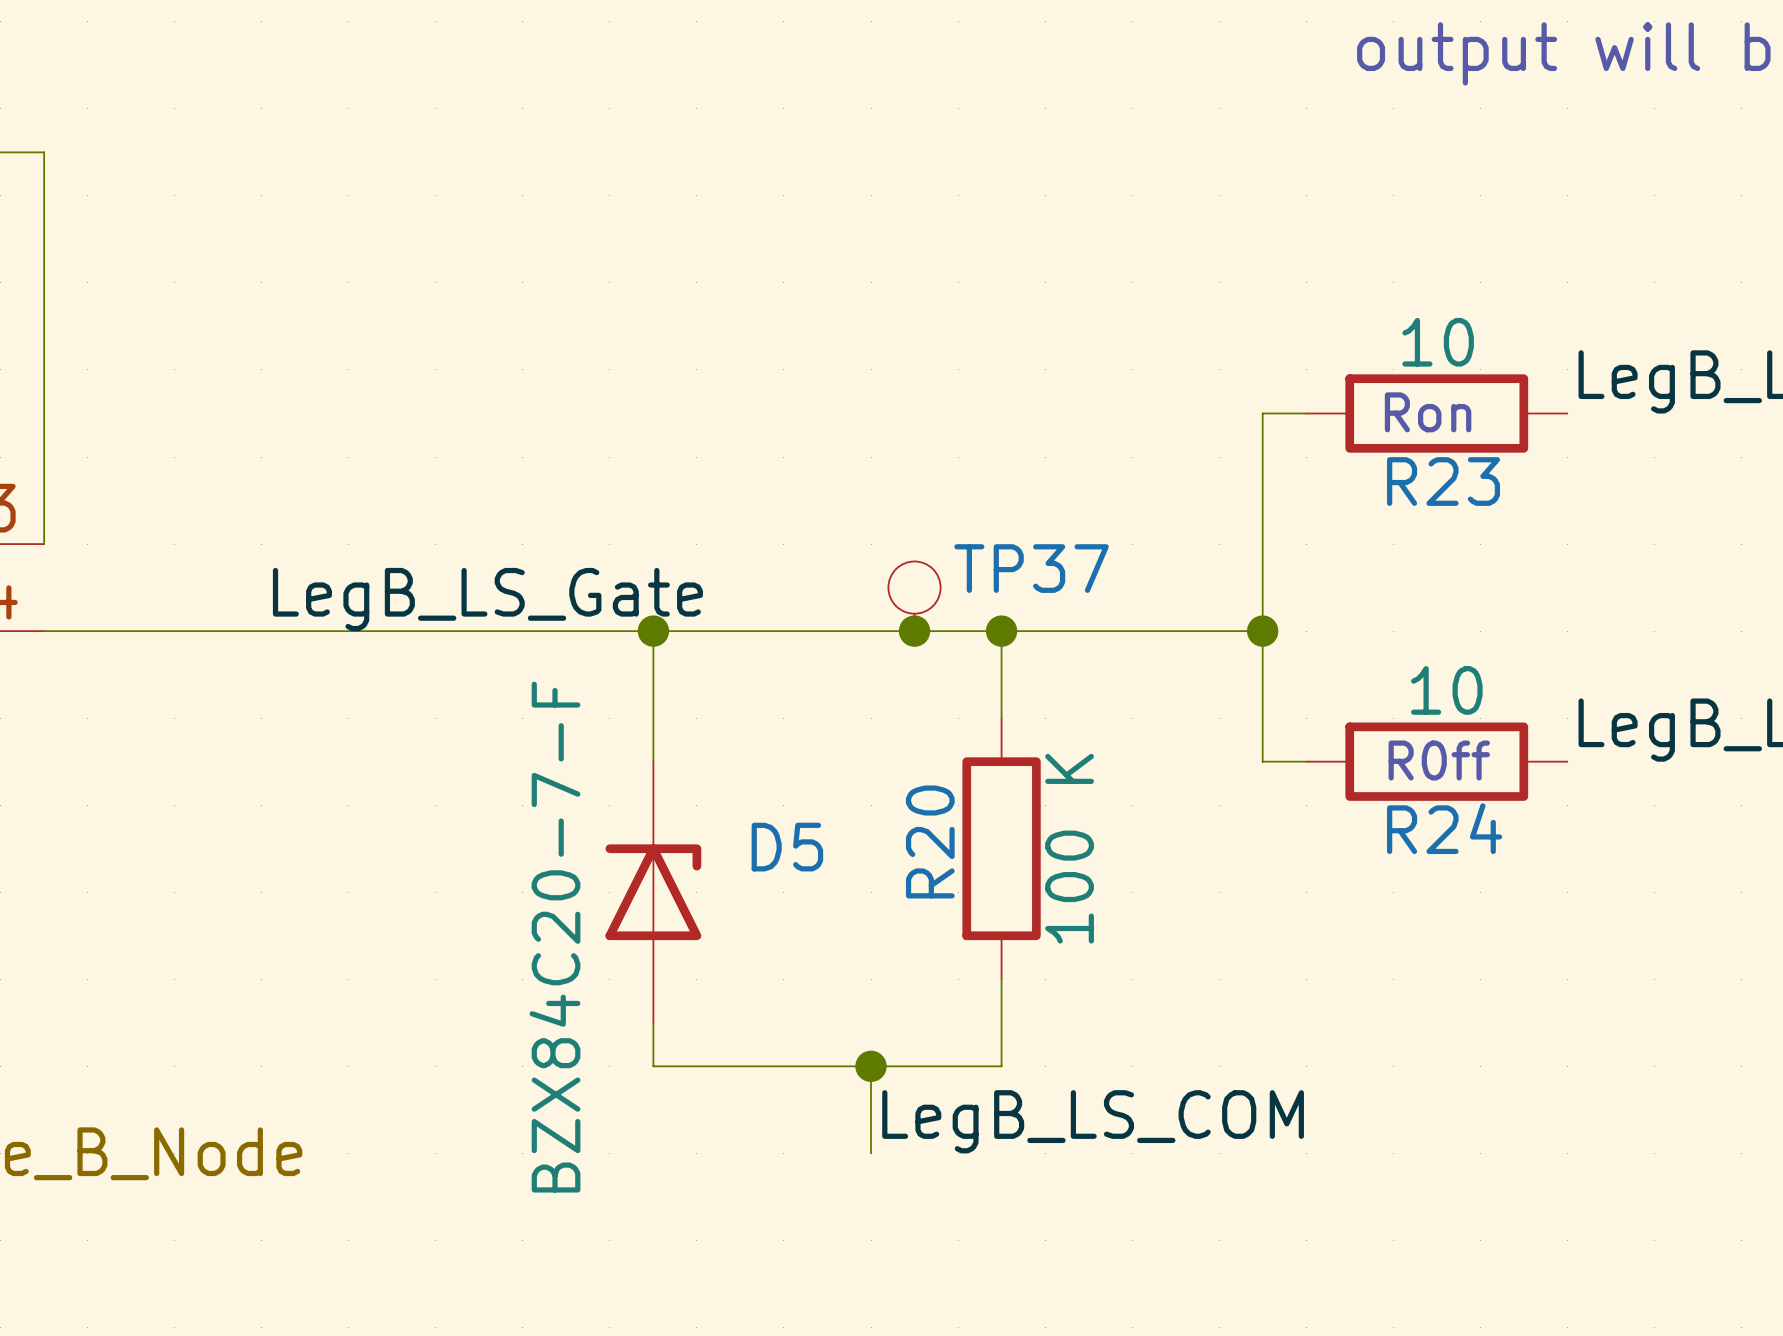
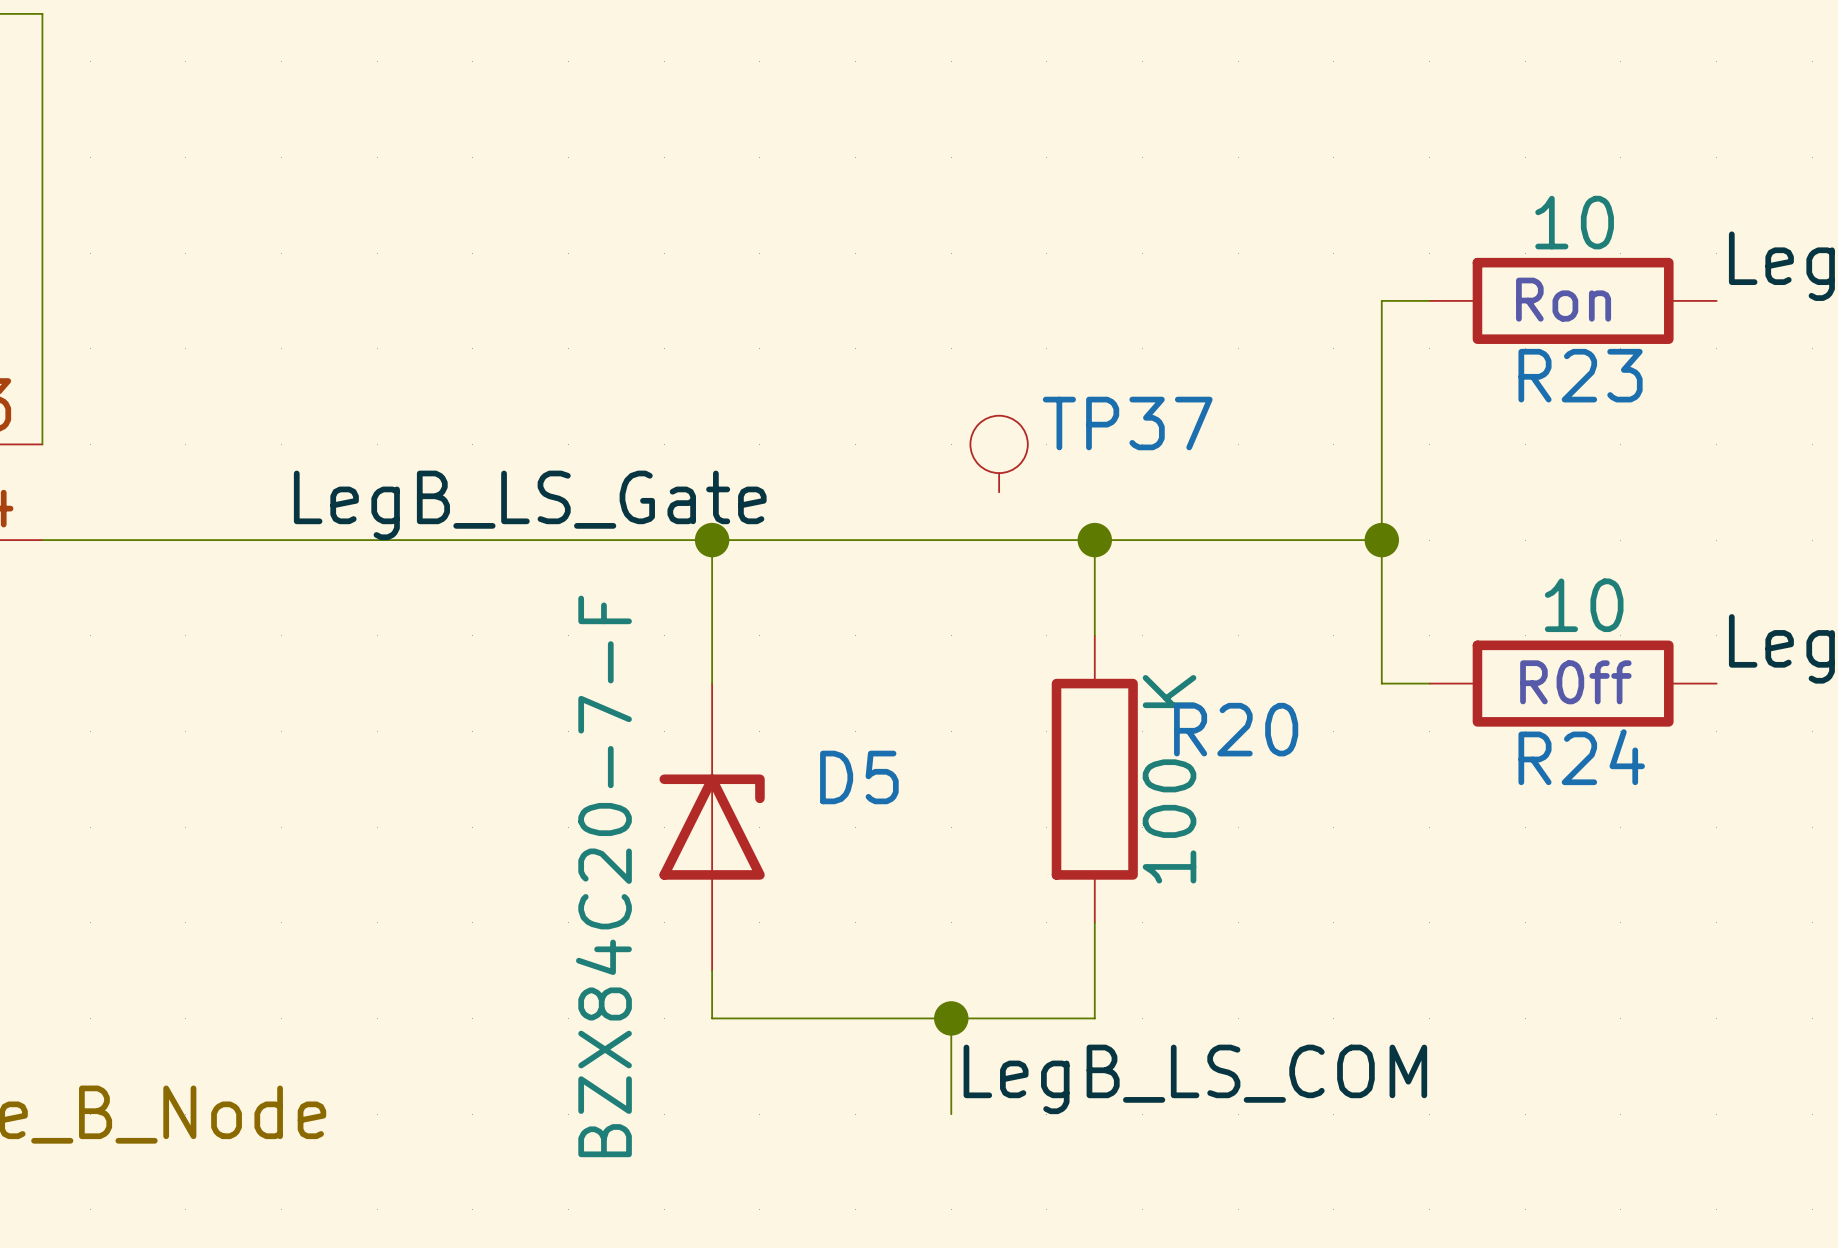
TP37 position: (914, 596) -> (999, 453)
junction: (914, 631) -> none
R20 name rotation: 0° (930, 841) -> 90° clockwise (1236, 729)
R20 name position: R20 (930, 841) -> R20 (1236, 729)

